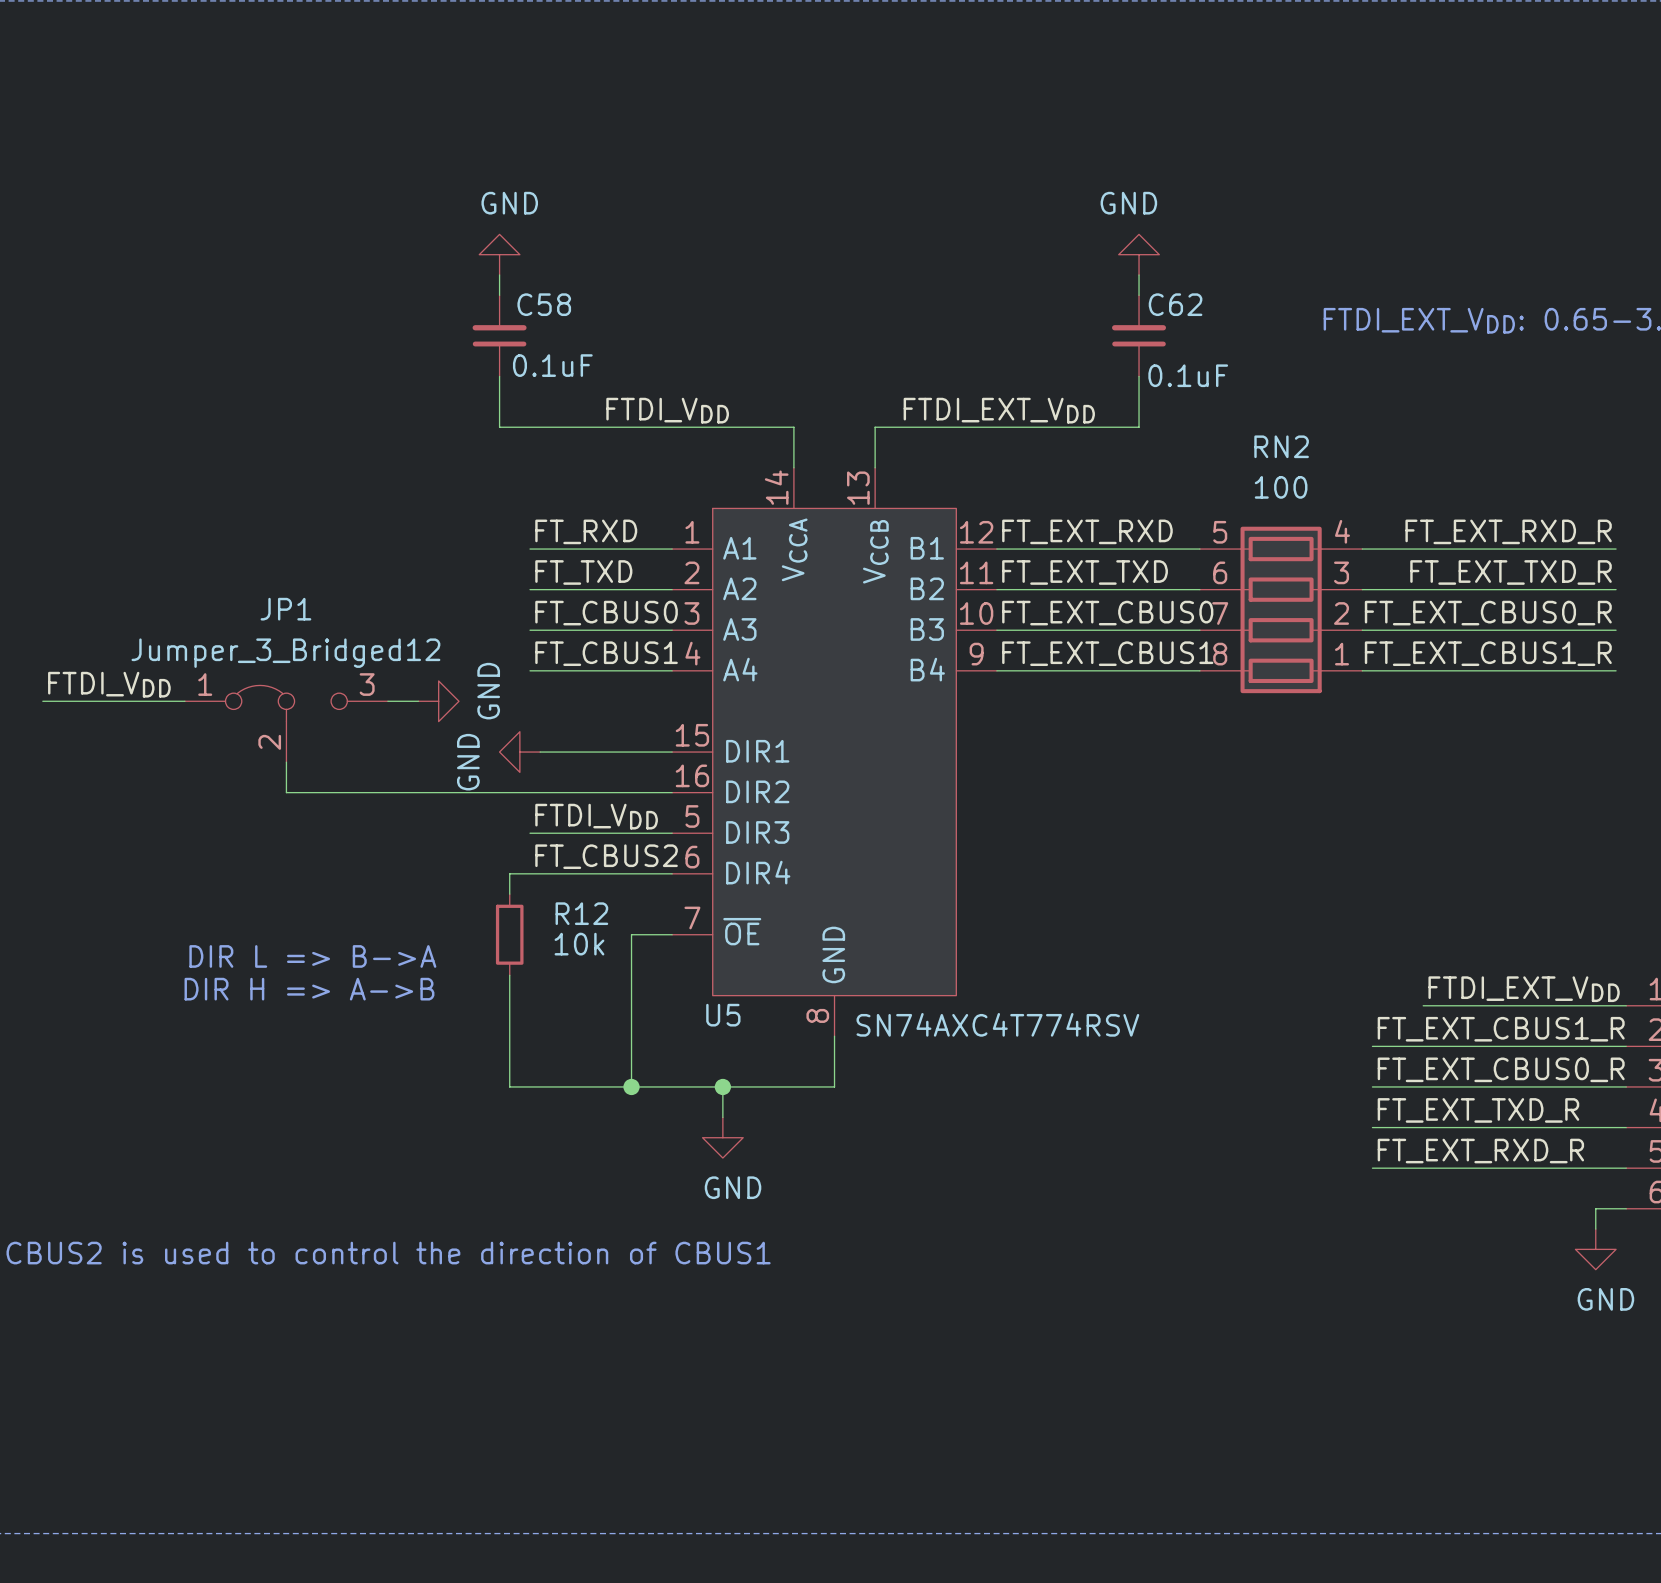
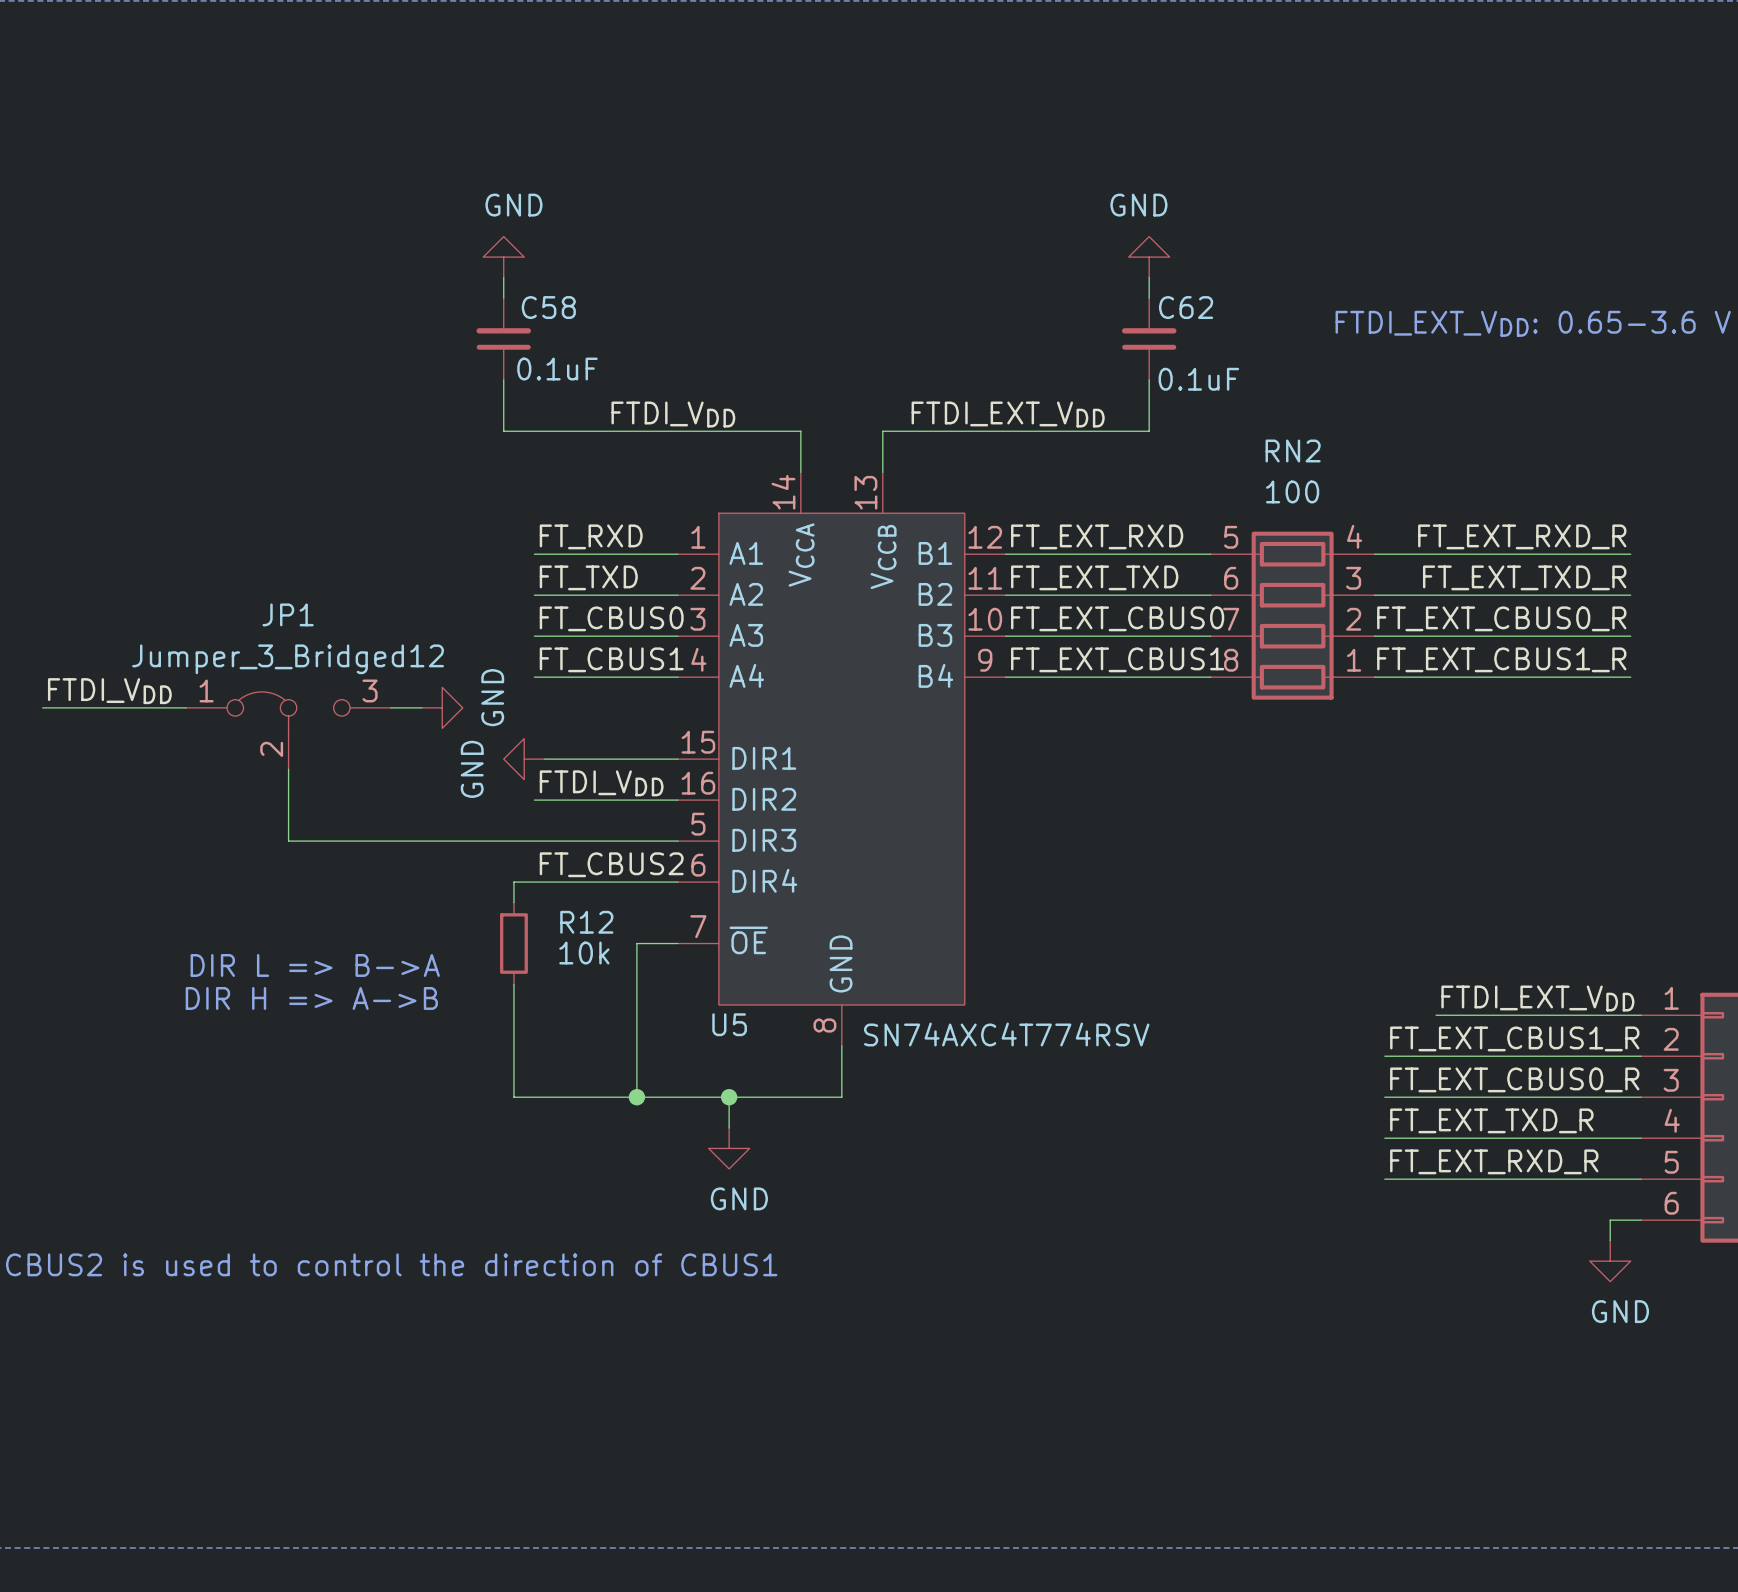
wire: (286, 792) (530, 792) -> (288, 800) (288, 841) (534, 841)
label position: FTDI_VDD (596, 816) -> FTDI_VDD (601, 783)

